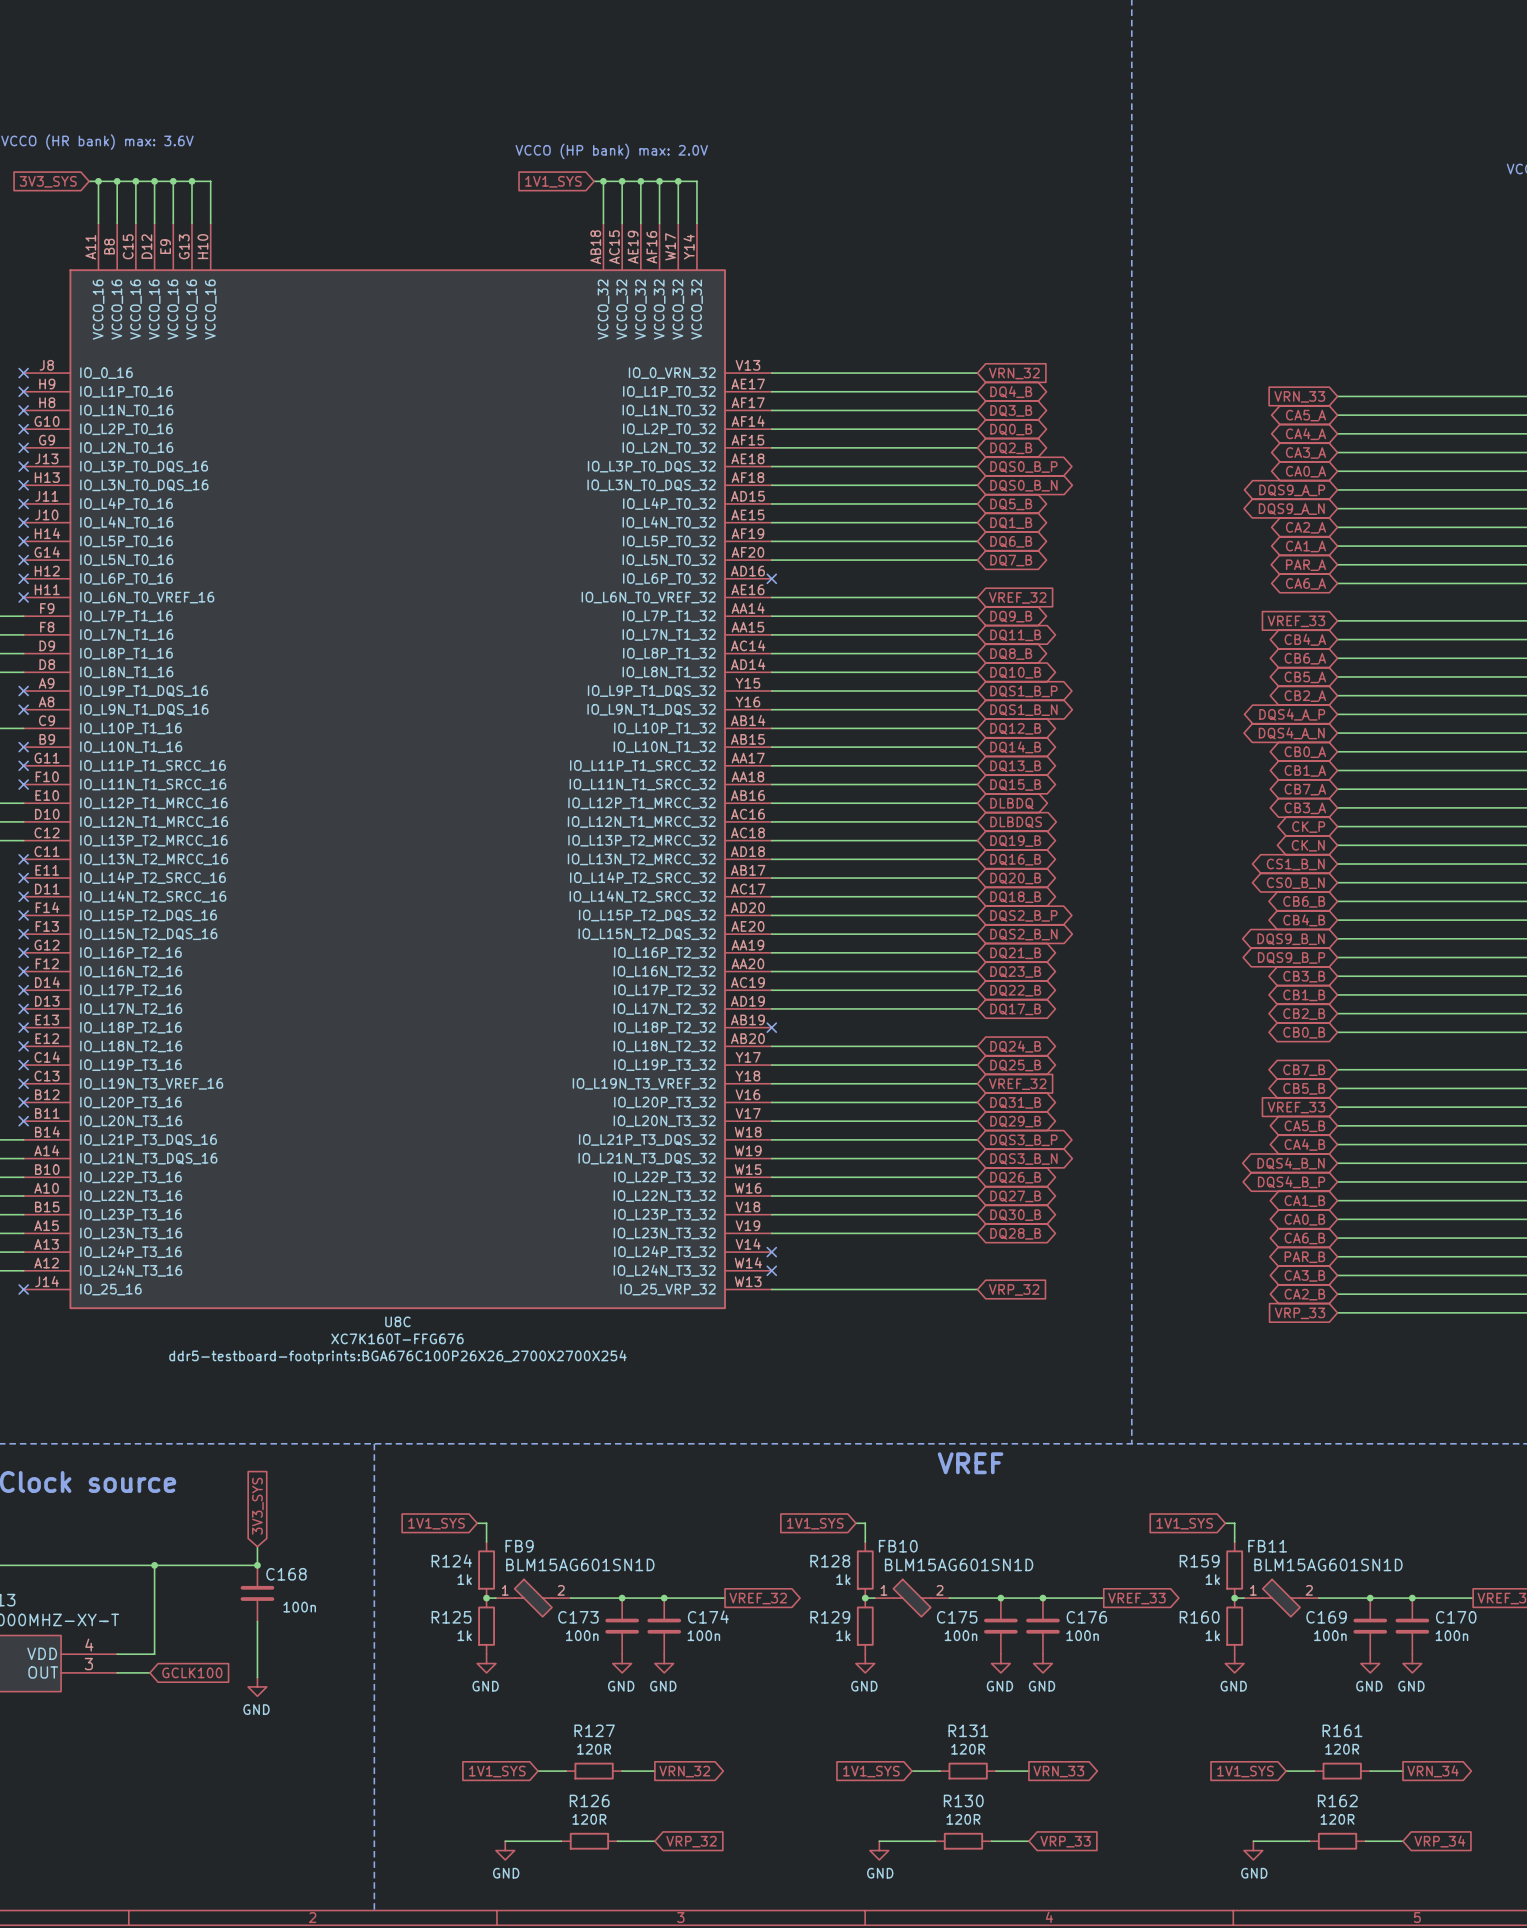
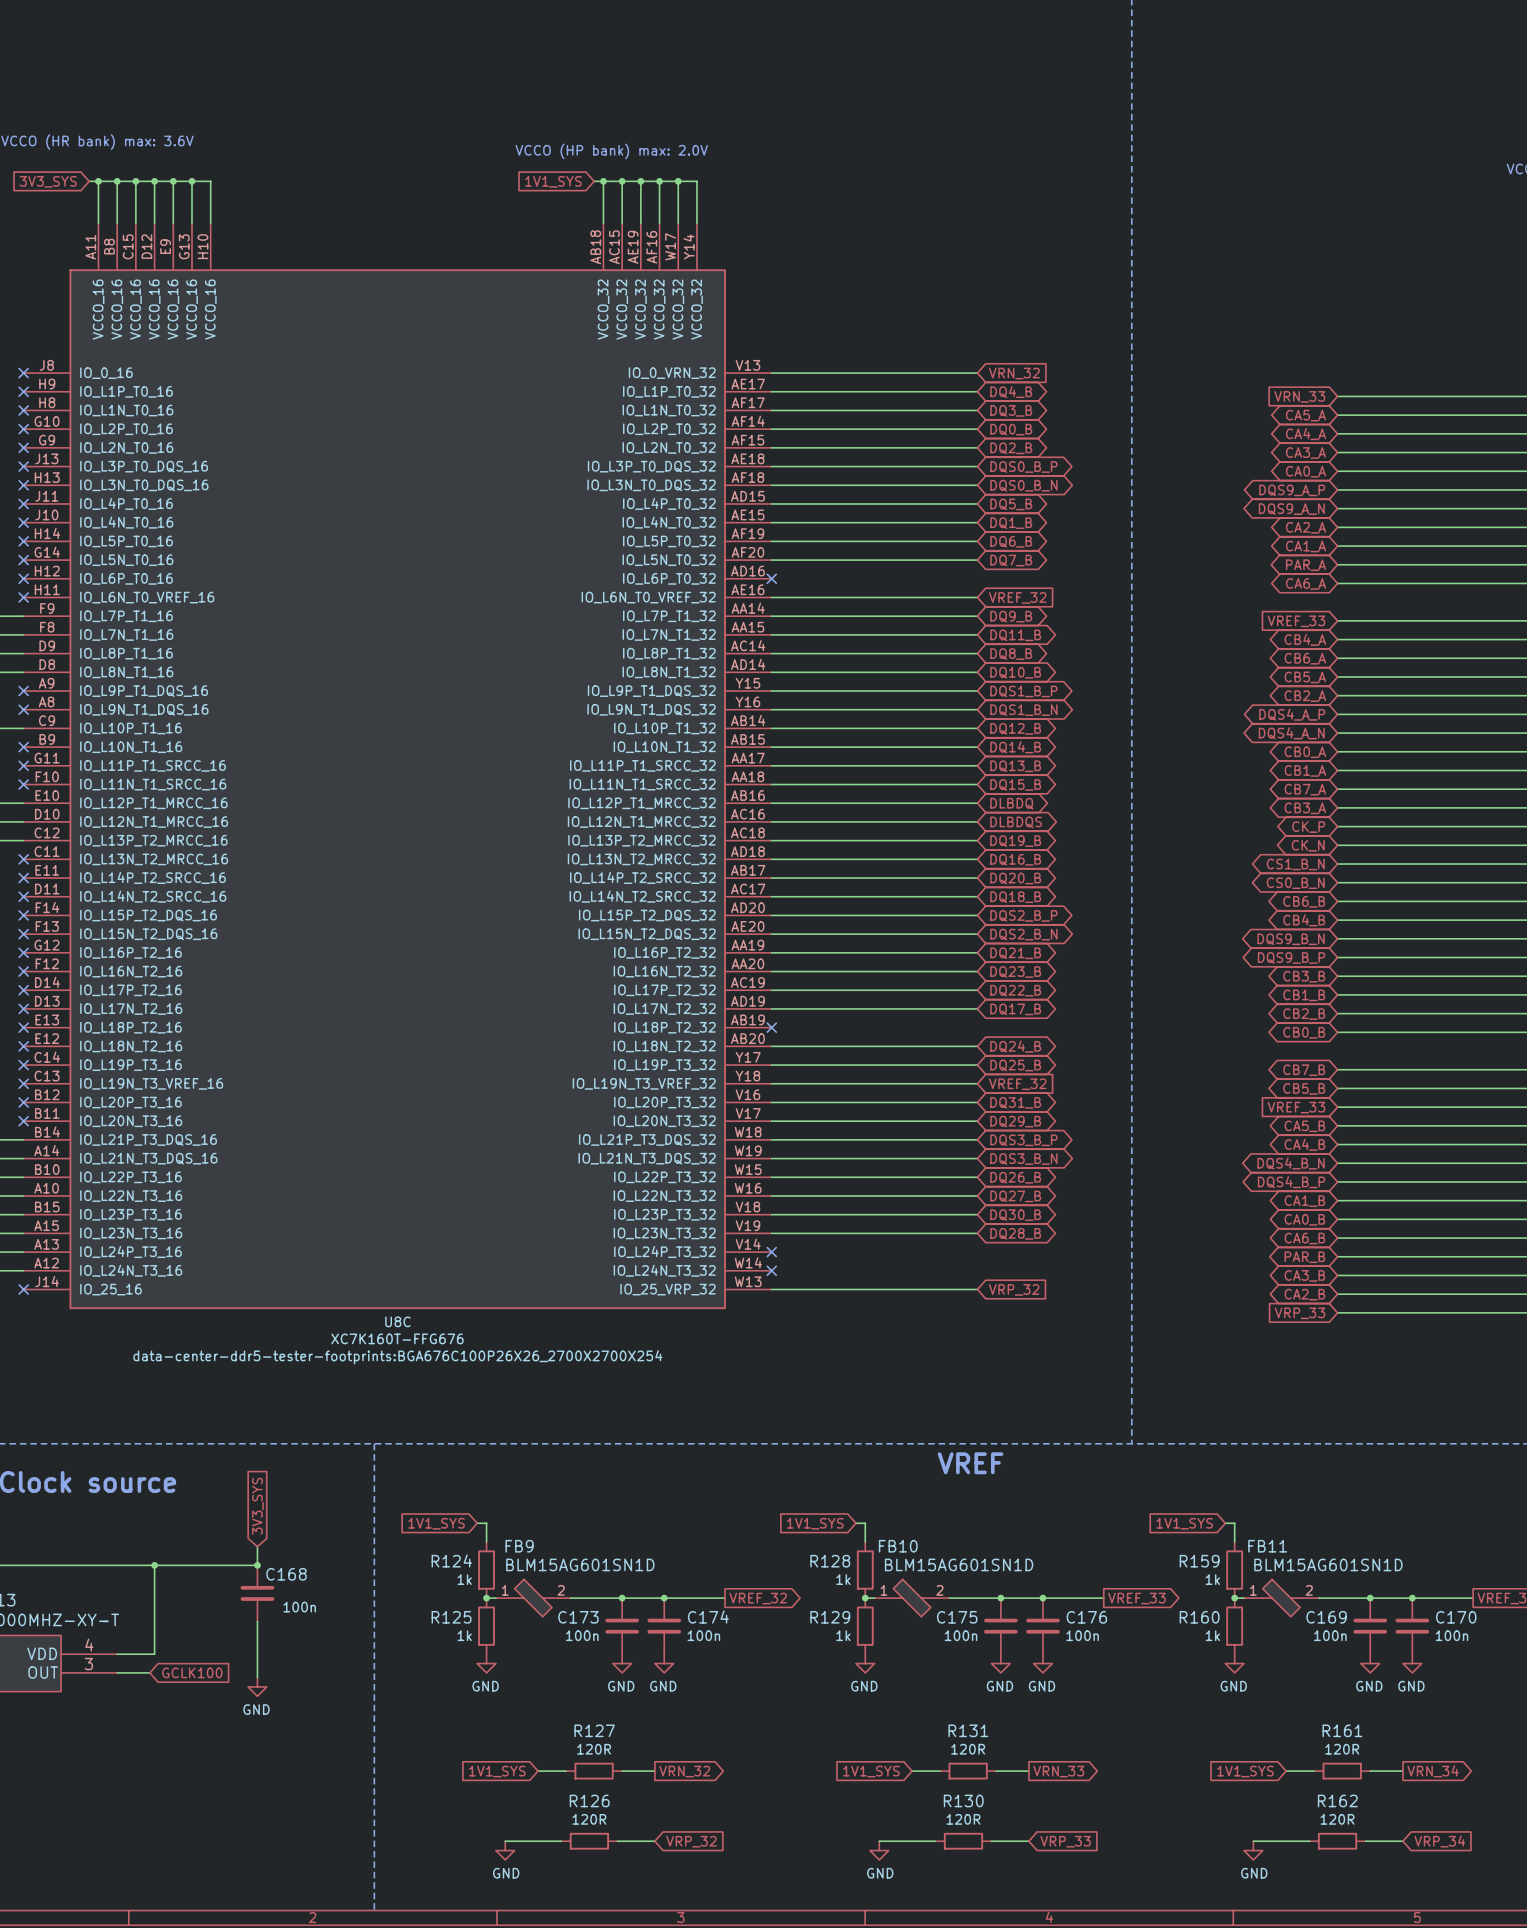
U8C text: ddr5-testboard-footprints:BGA676C100P26X26_2700X2700X254 (397, 1357) -> data-center-ddr5-tester-footprints:BGA676C100P26X26_2700X2700X254 (397, 1357)

